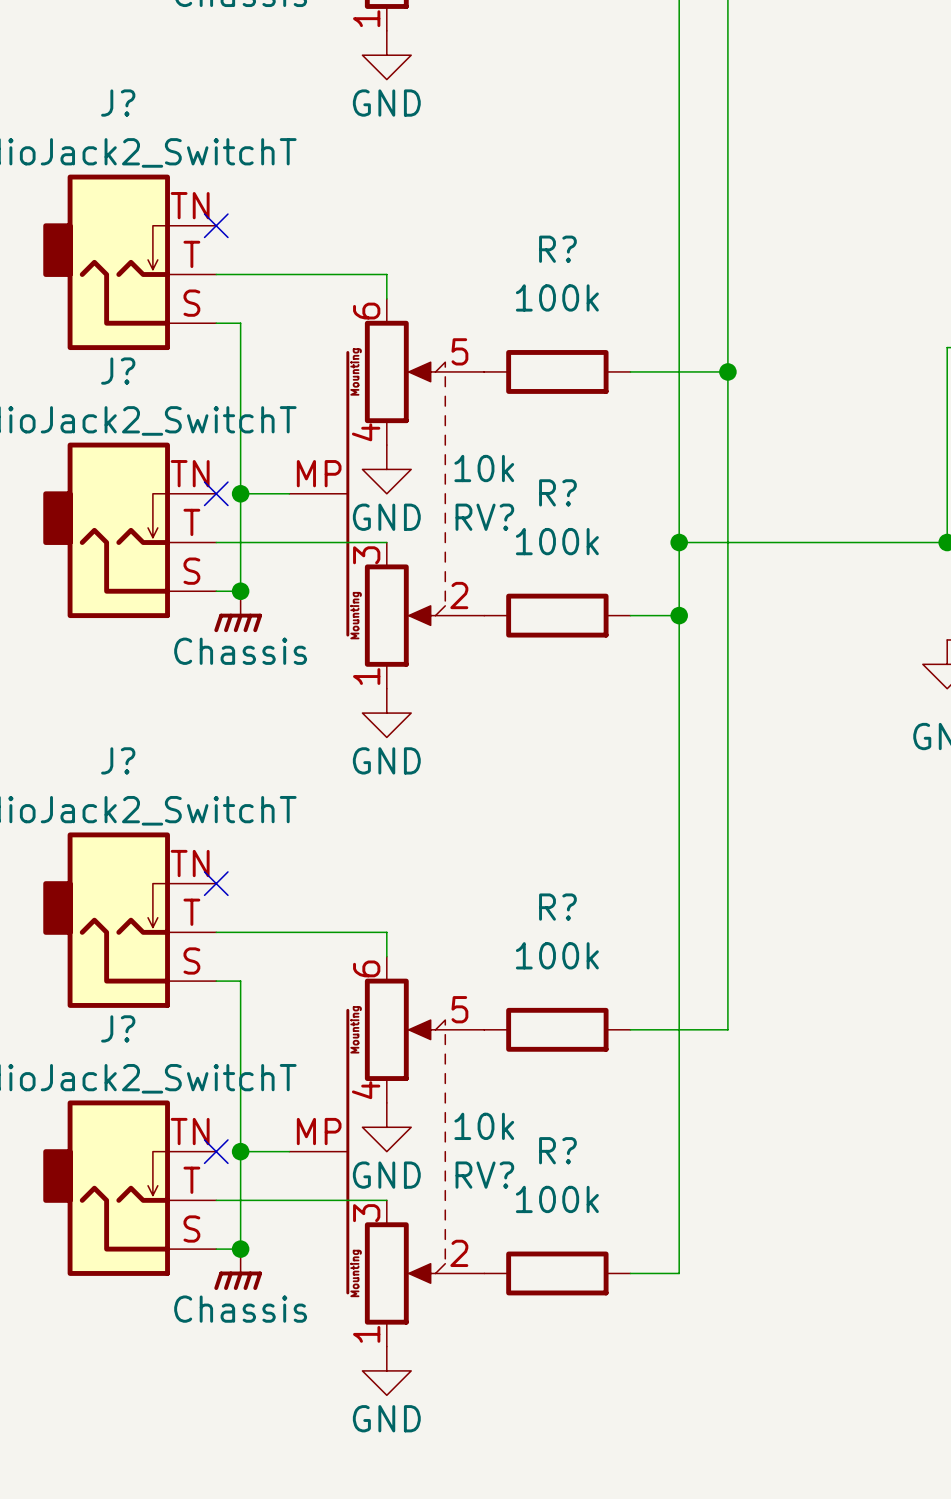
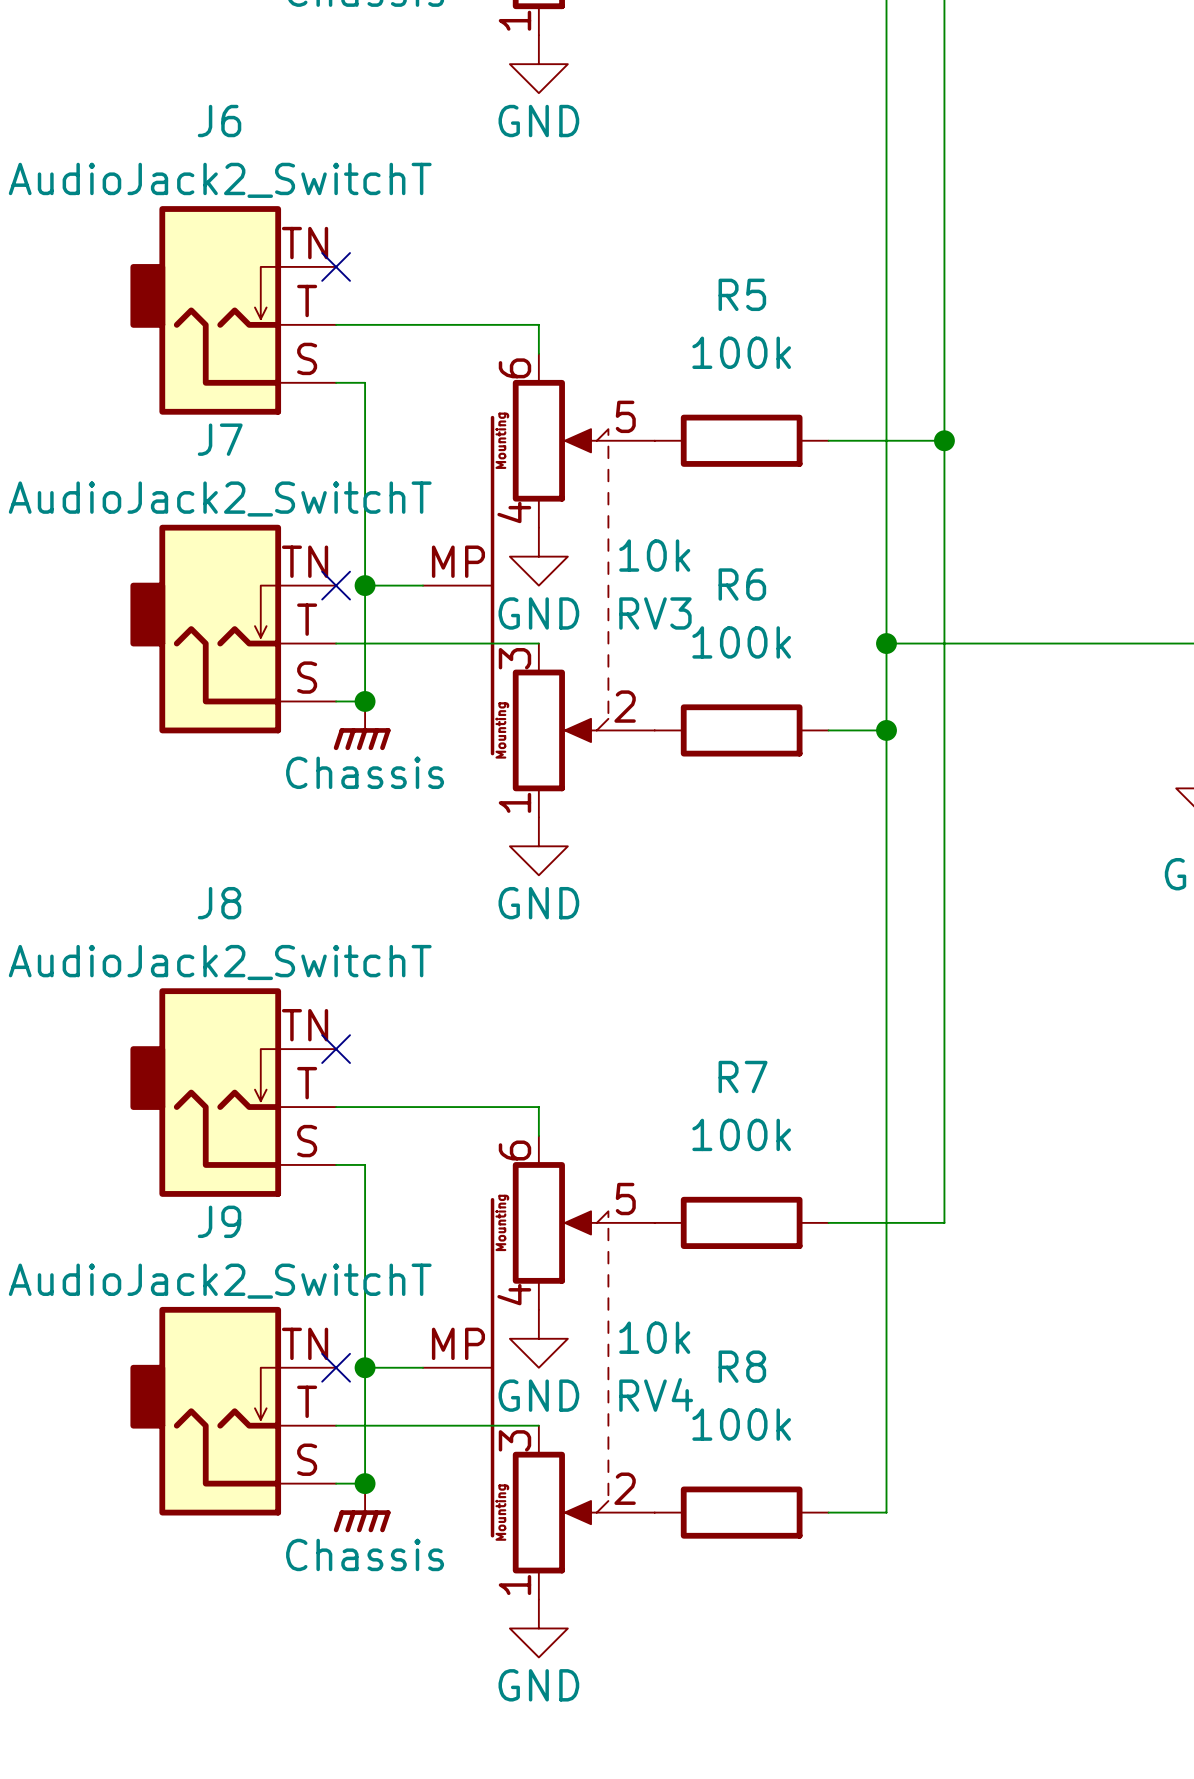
J? name: J? (118, 103) -> J6 (219, 121)
R? name: R? (557, 249) -> R5 (742, 294)
J? name: J? (118, 371) -> J7 (220, 439)
R? name: R? (557, 492) -> R6 (742, 584)
RV? name: RV? (484, 517) -> RV3 (655, 613)
J? name: J? (118, 760) -> J8 (219, 903)
R? name: R? (557, 907) -> R7 (743, 1076)
J? name: J? (118, 1028) -> J9 (219, 1221)
R? name: R? (557, 1150) -> R8 (742, 1366)
RV? name: RV? (484, 1175) -> RV4 (656, 1394)

